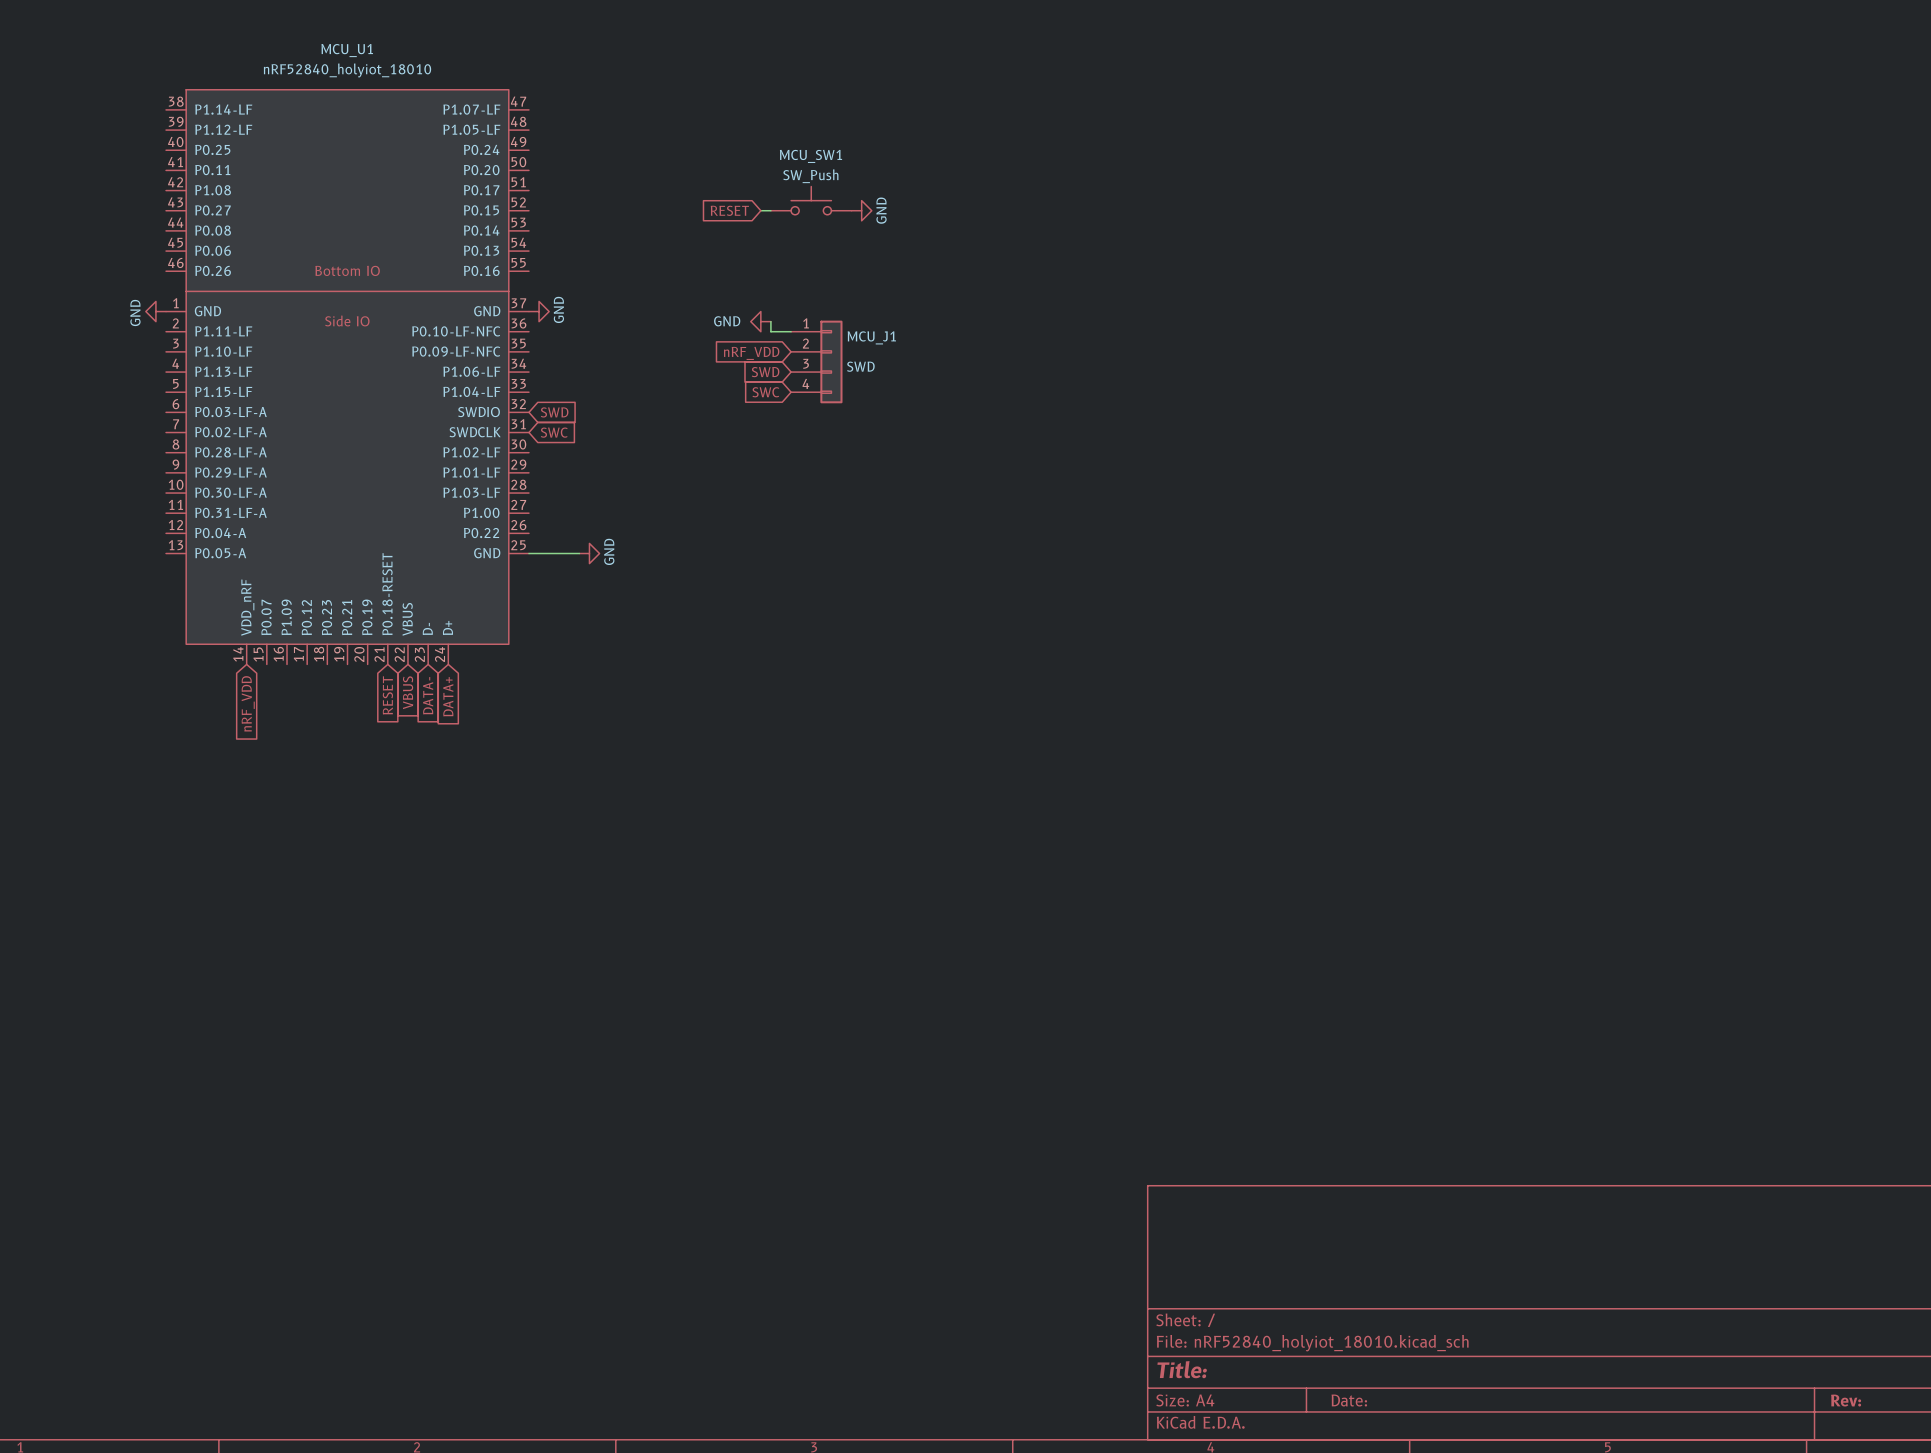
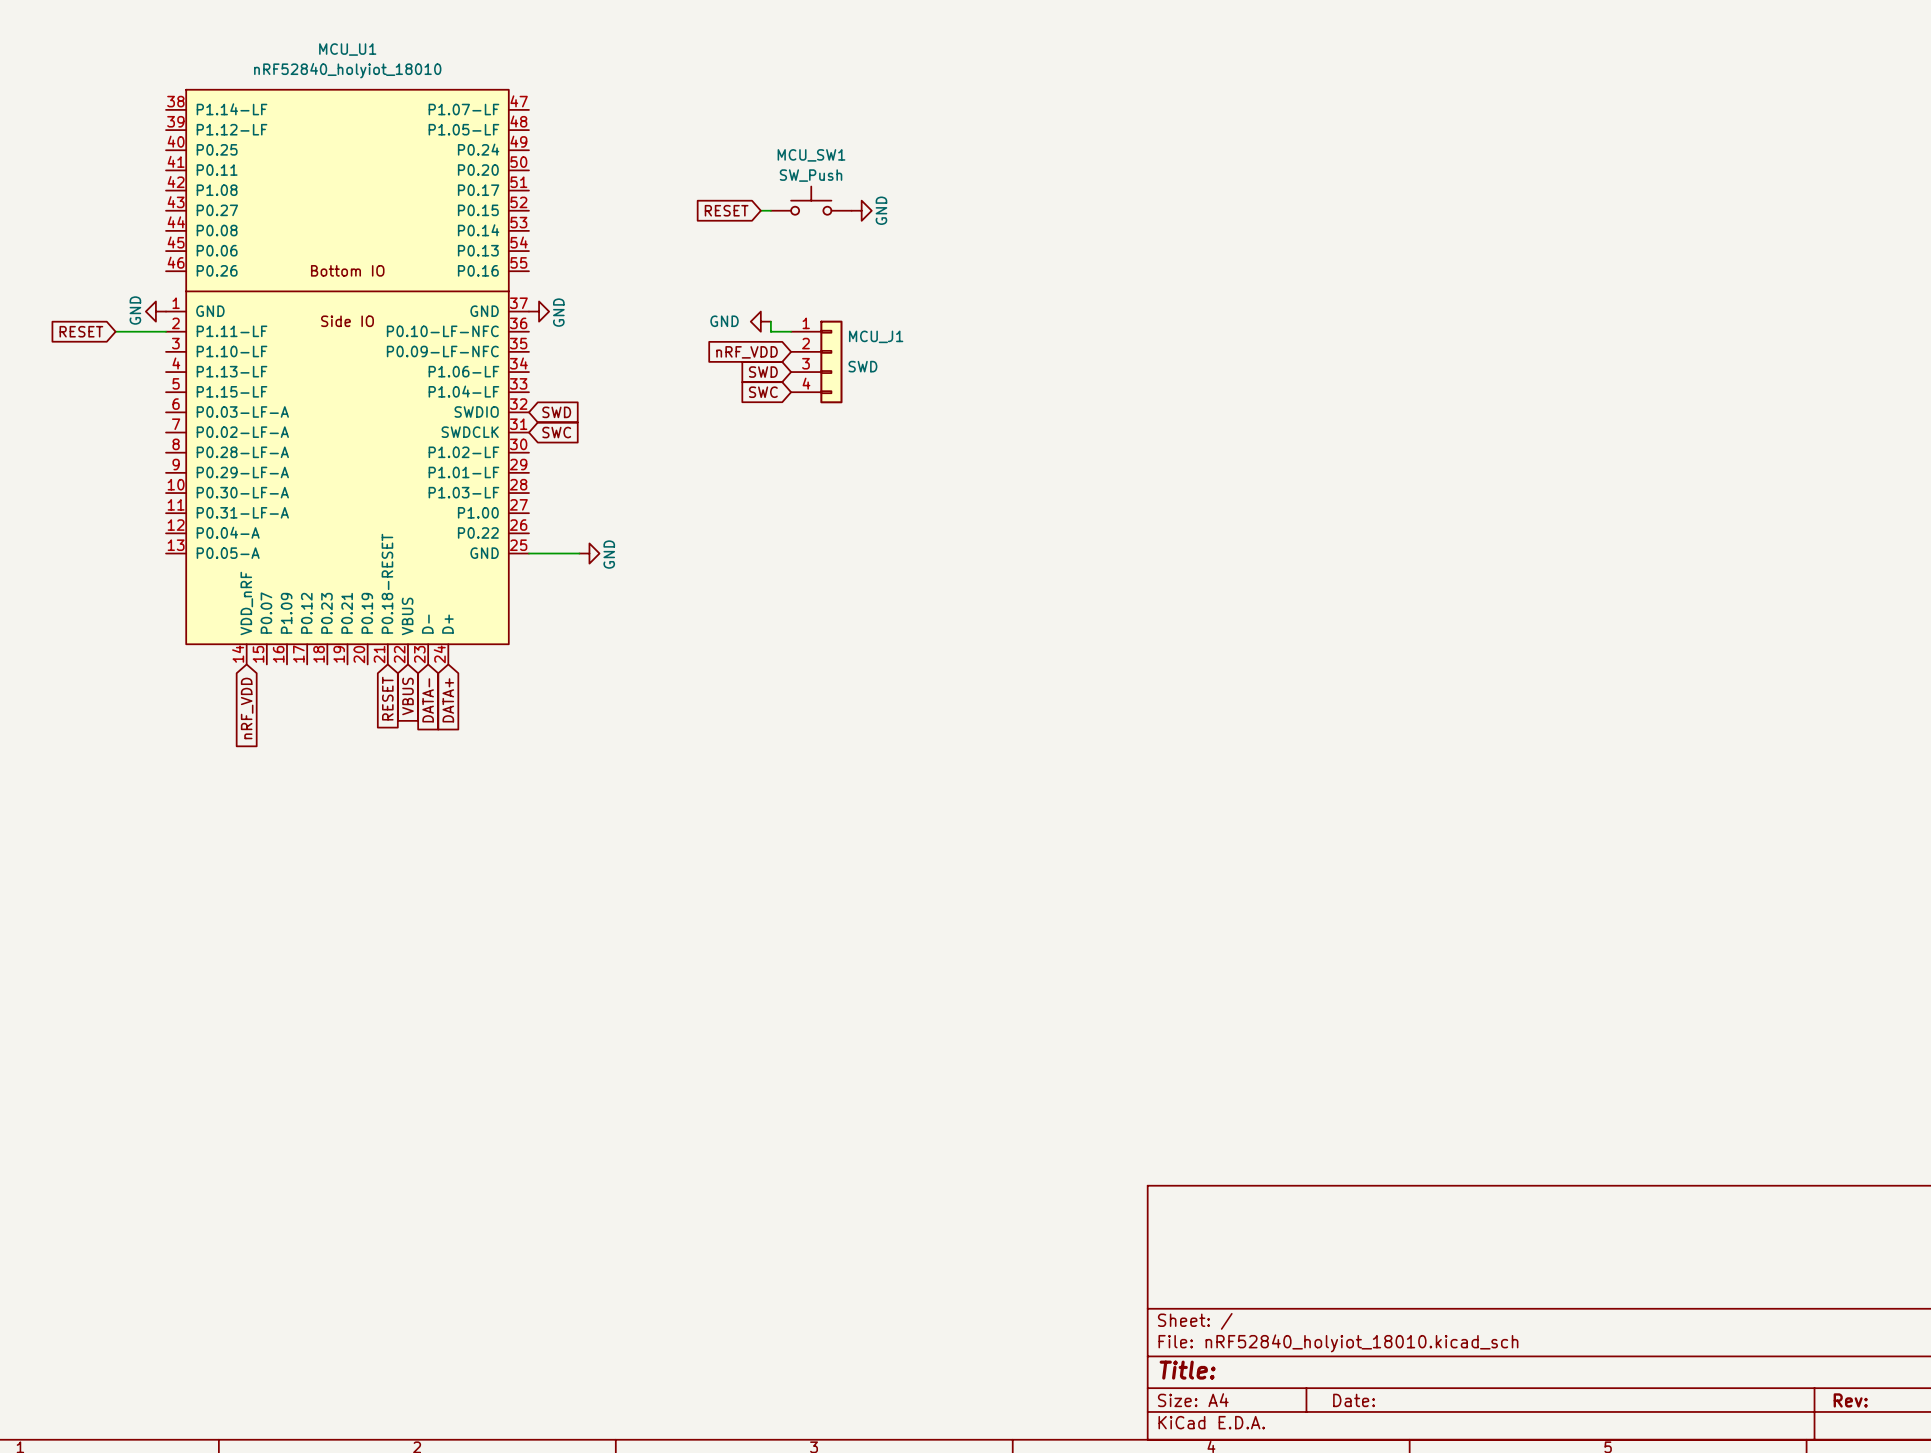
global label: none -> RESET (81, 331)
wire: none -> (115, 331) (166, 331)

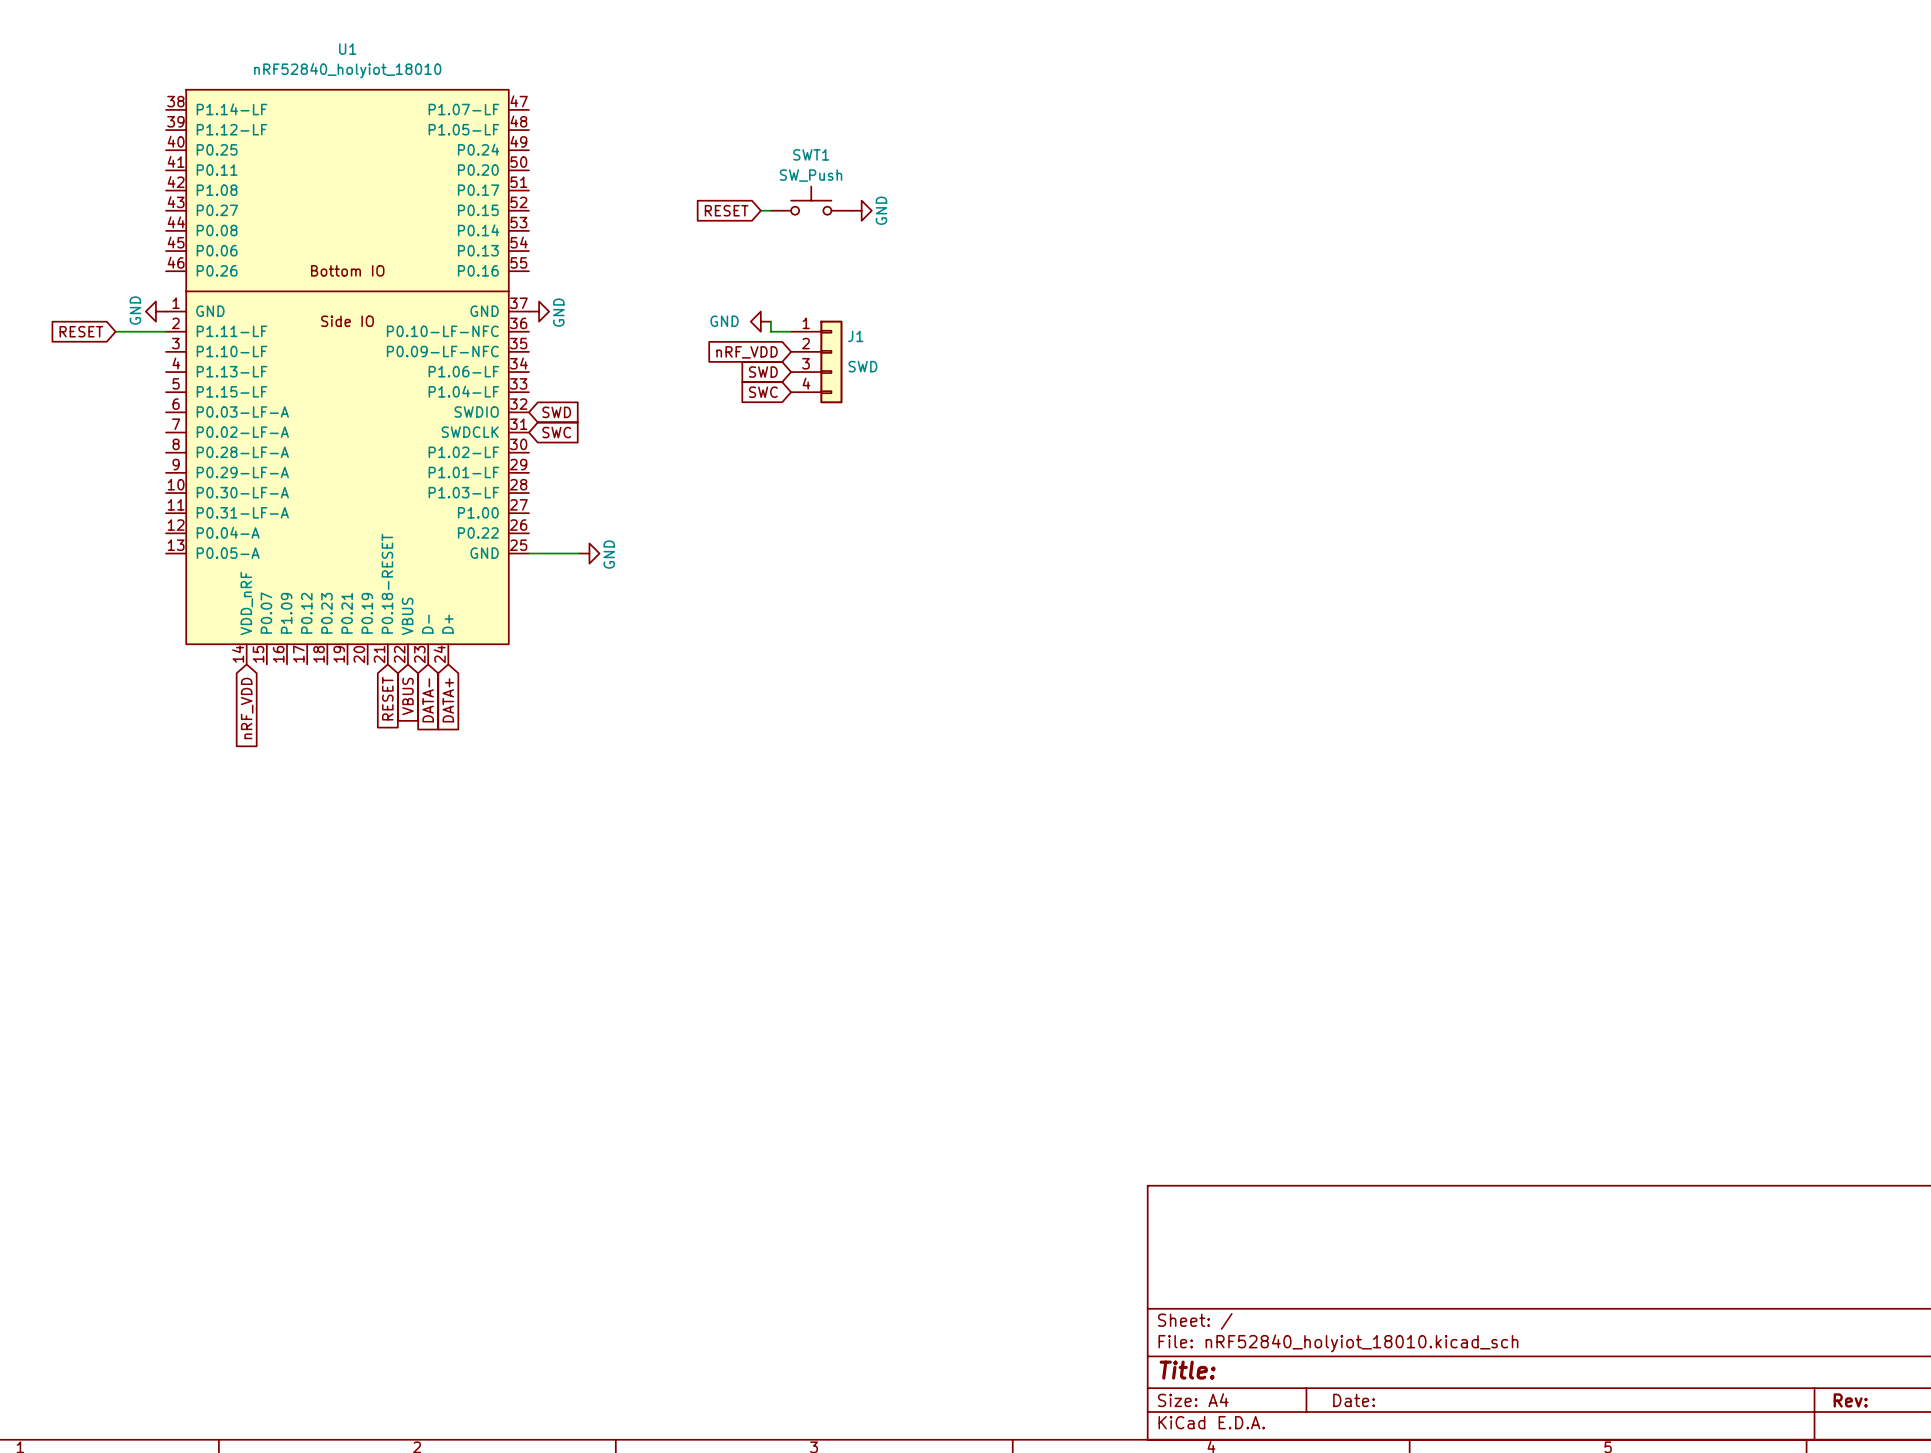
MCU_U1 name: MCU_U1 (347, 49) -> U1 (347, 49)
MCU_SW1 name: MCU_SW1 (811, 155) -> SWT1 (811, 154)
MCU_J1 name: MCU_J1 (876, 336) -> J1 (855, 336)

